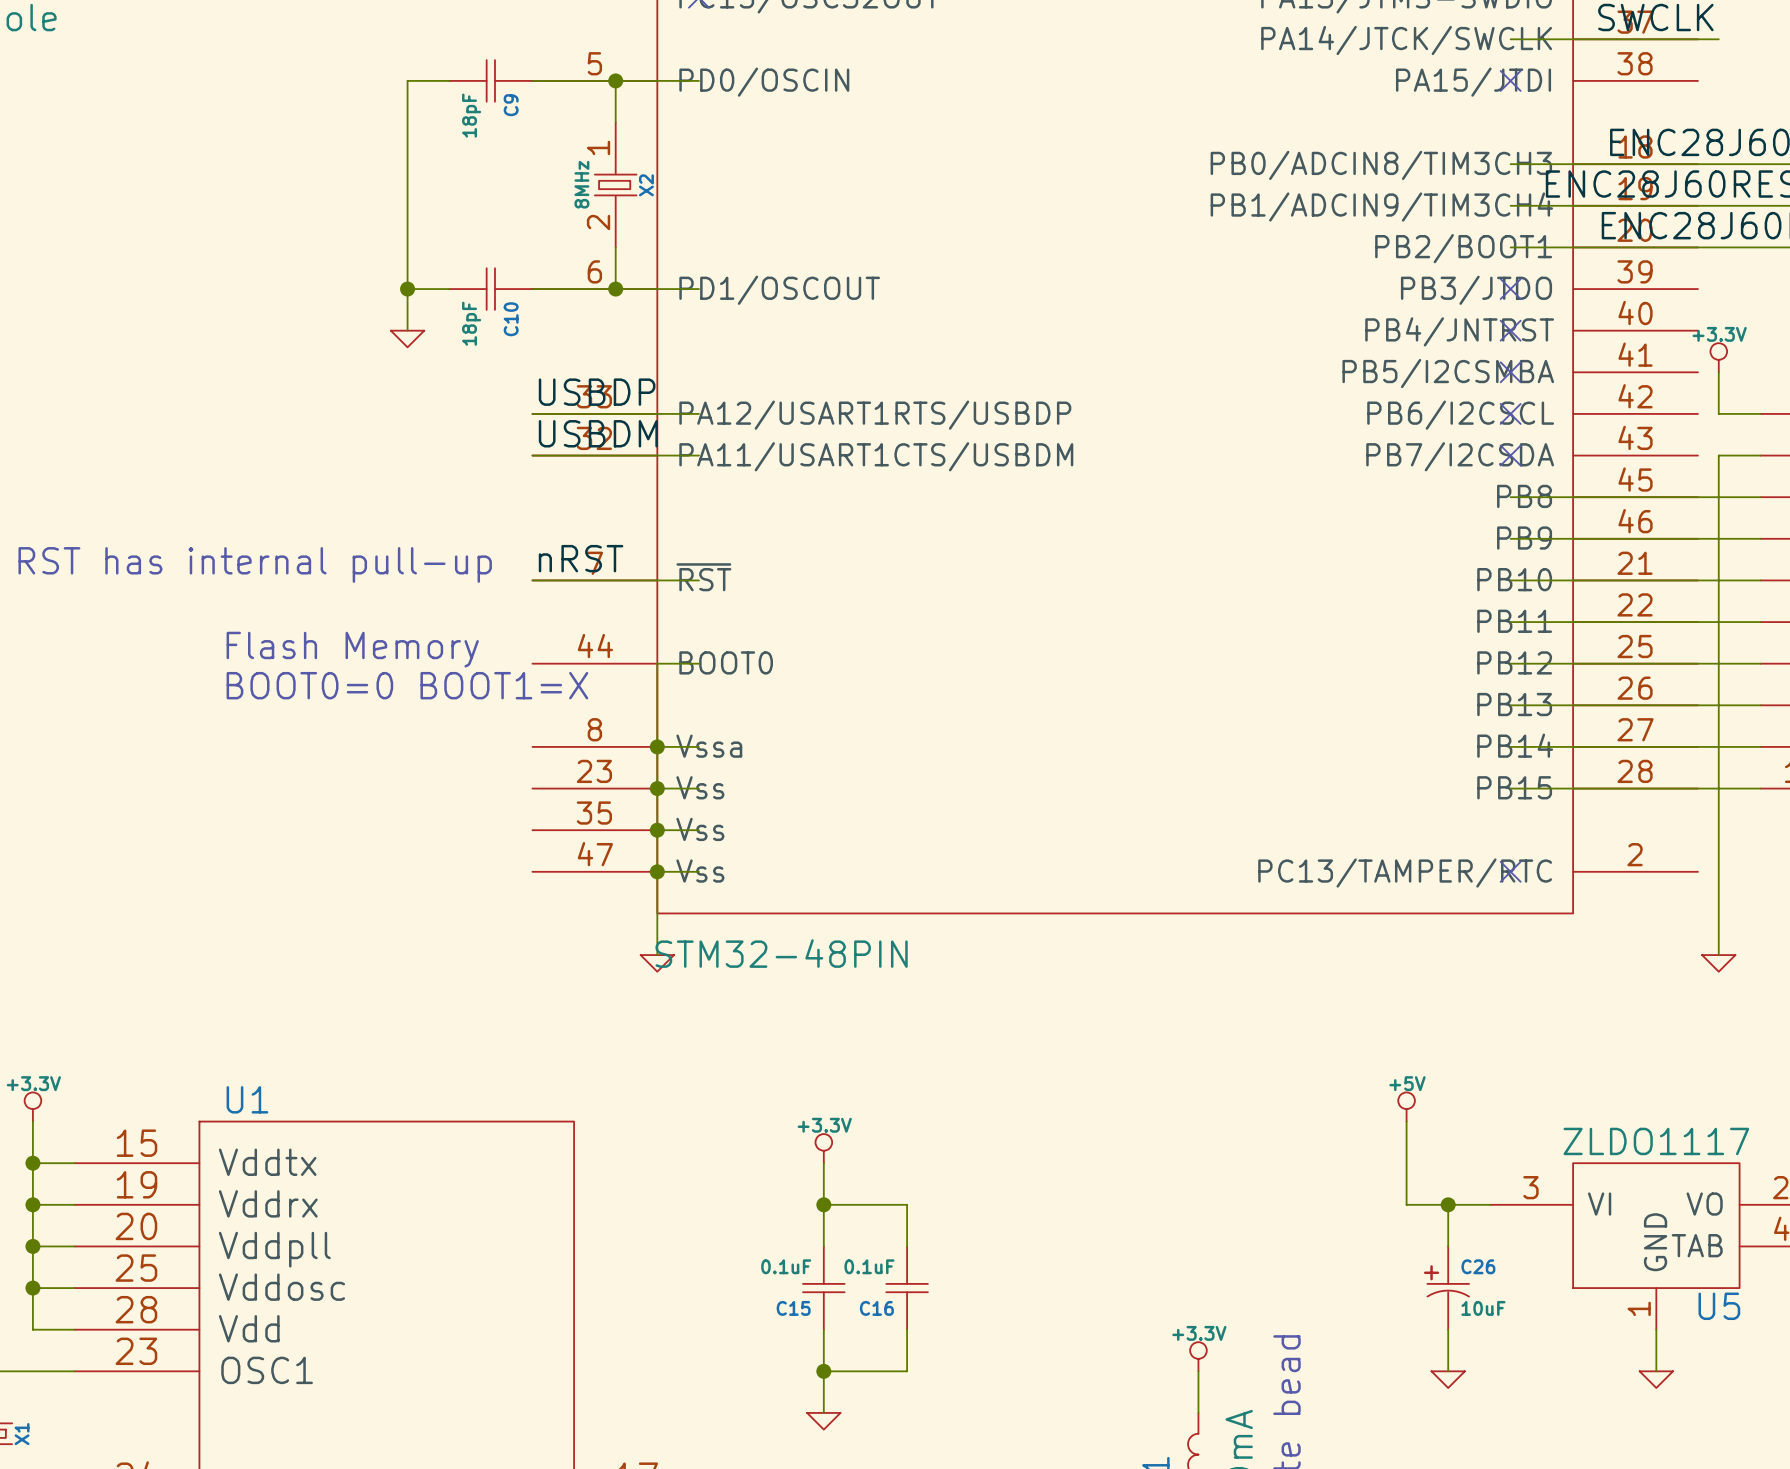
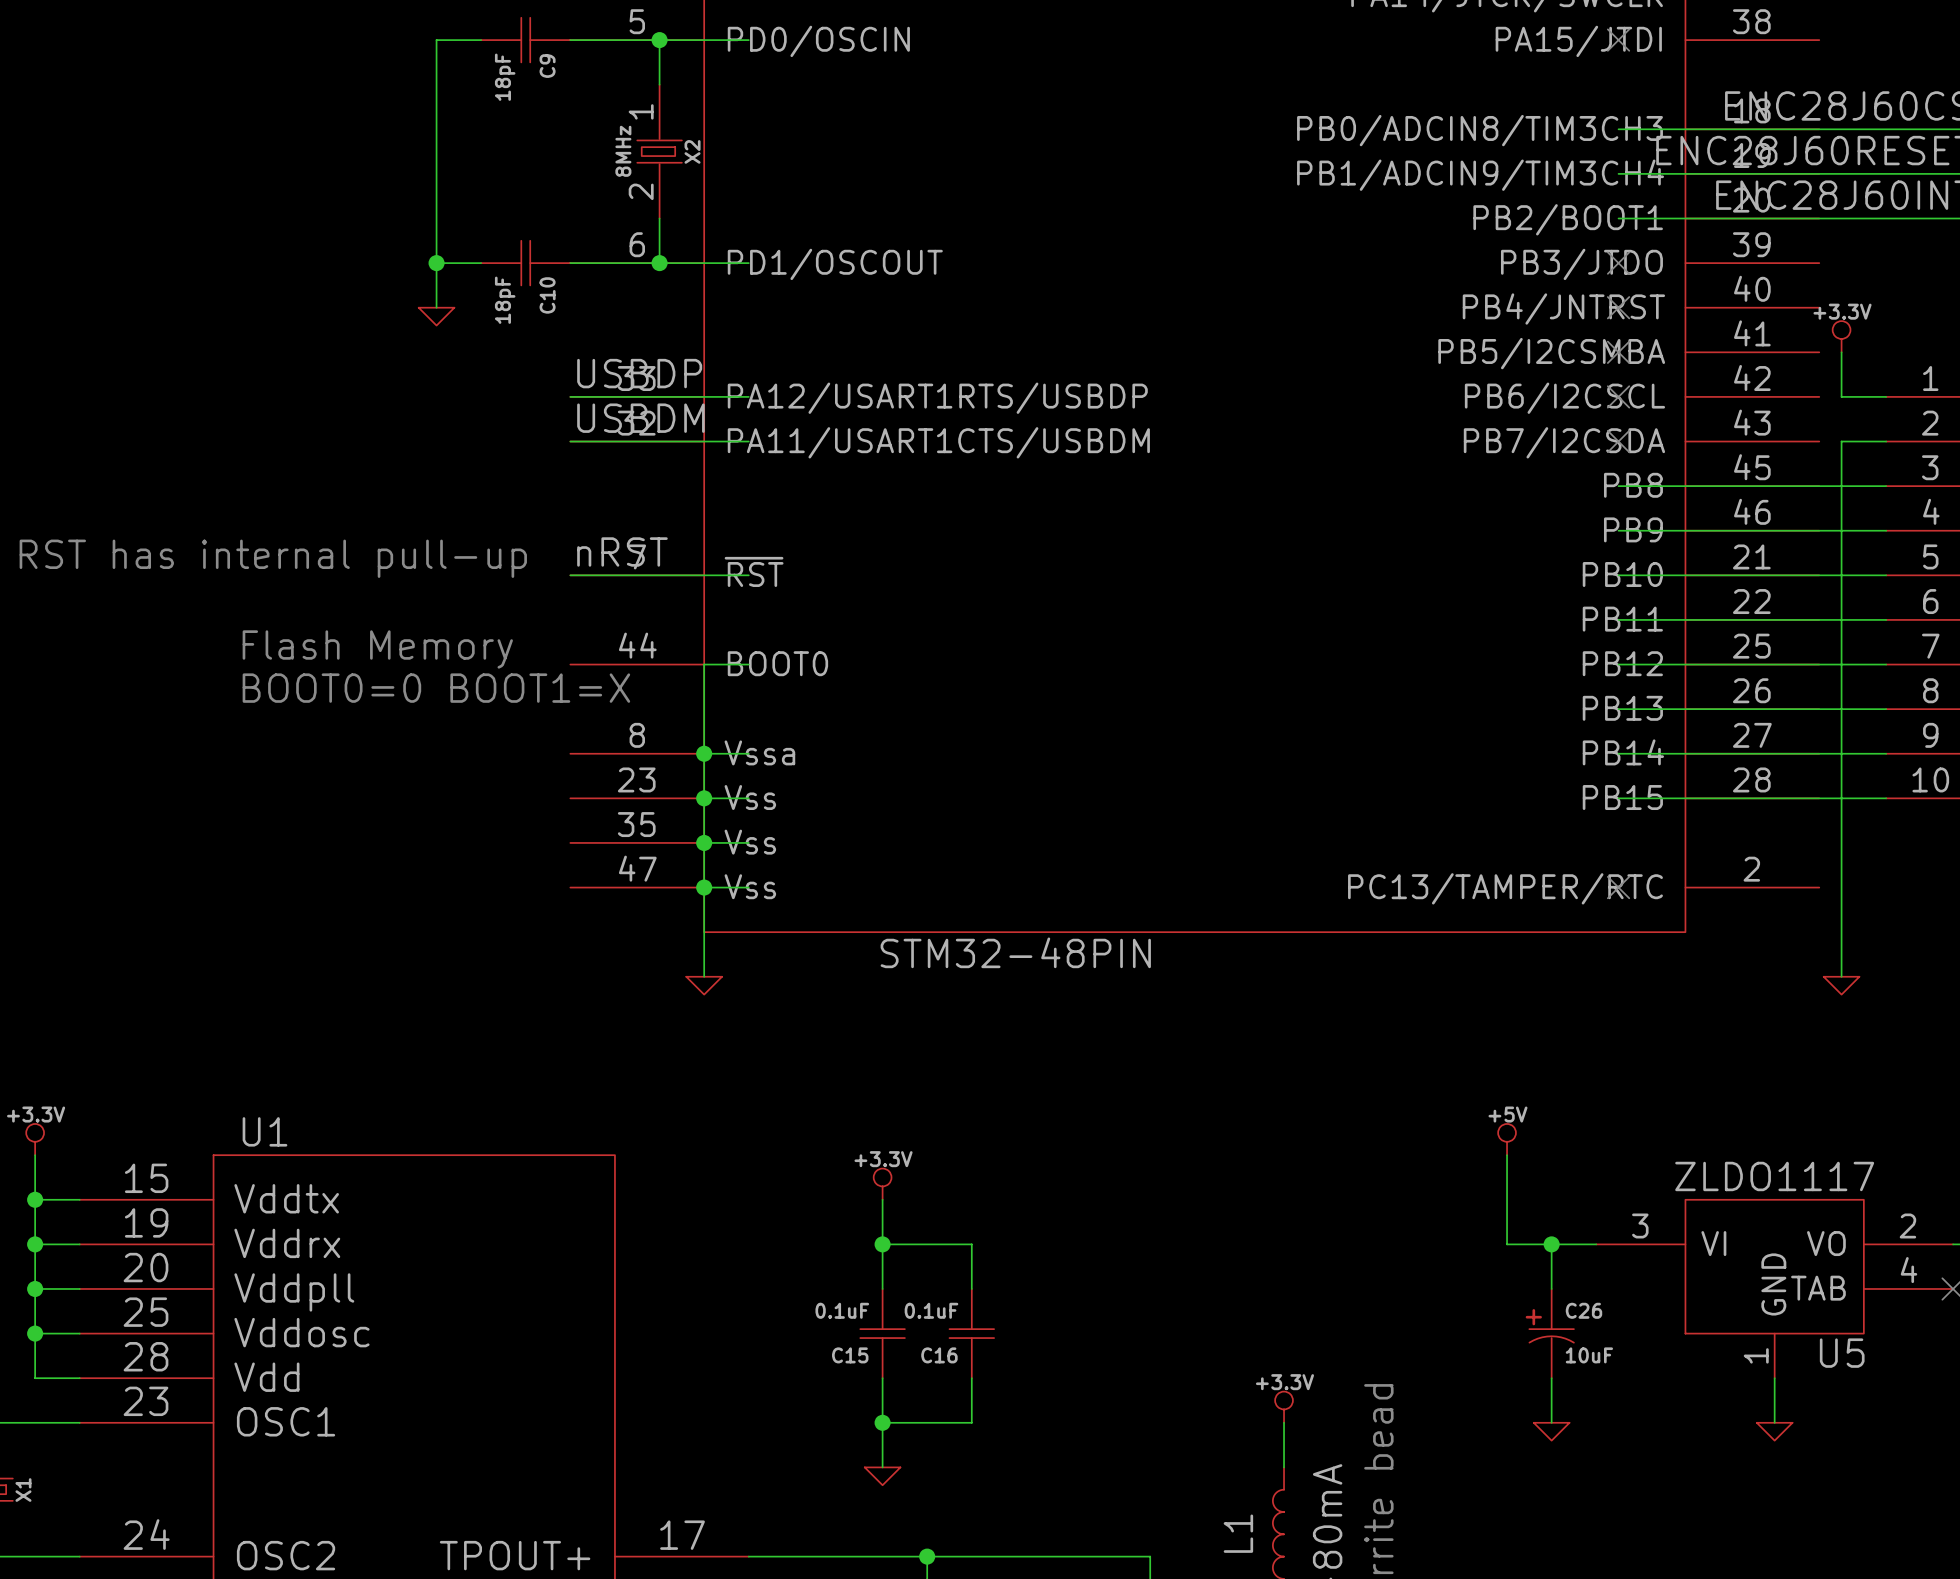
part value position: STM32-48PIN (781, 953) -> STM32-48PIN (1015, 952)

